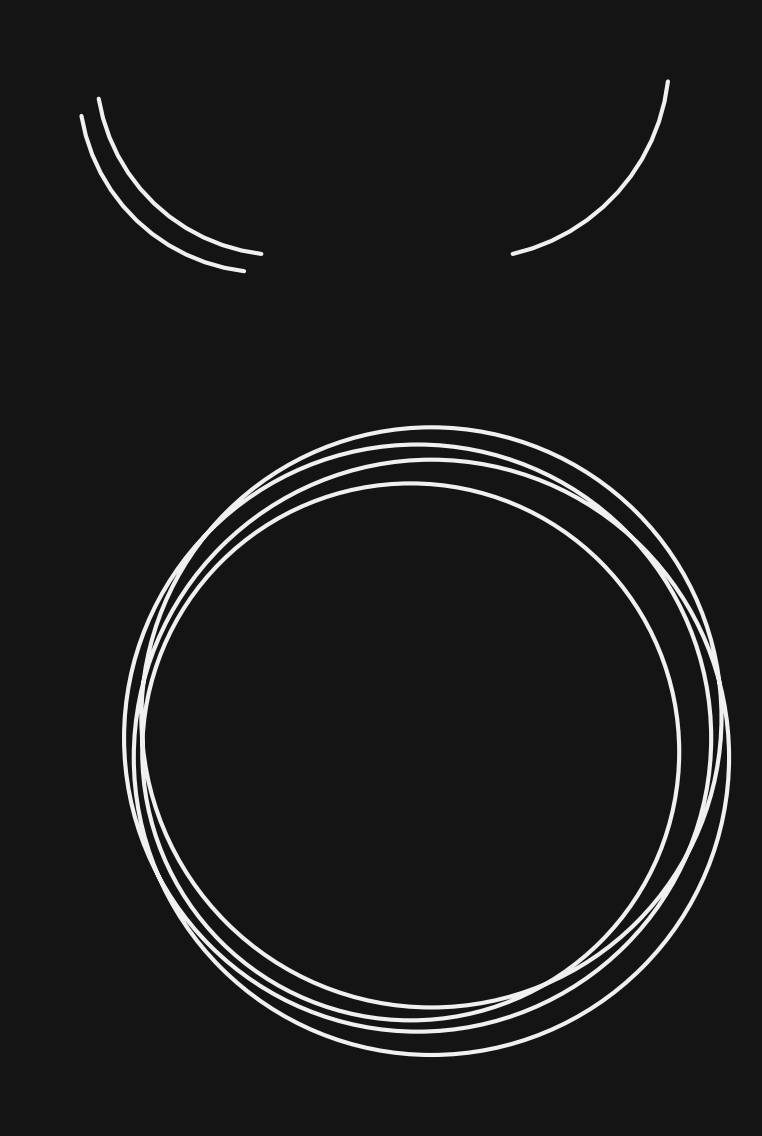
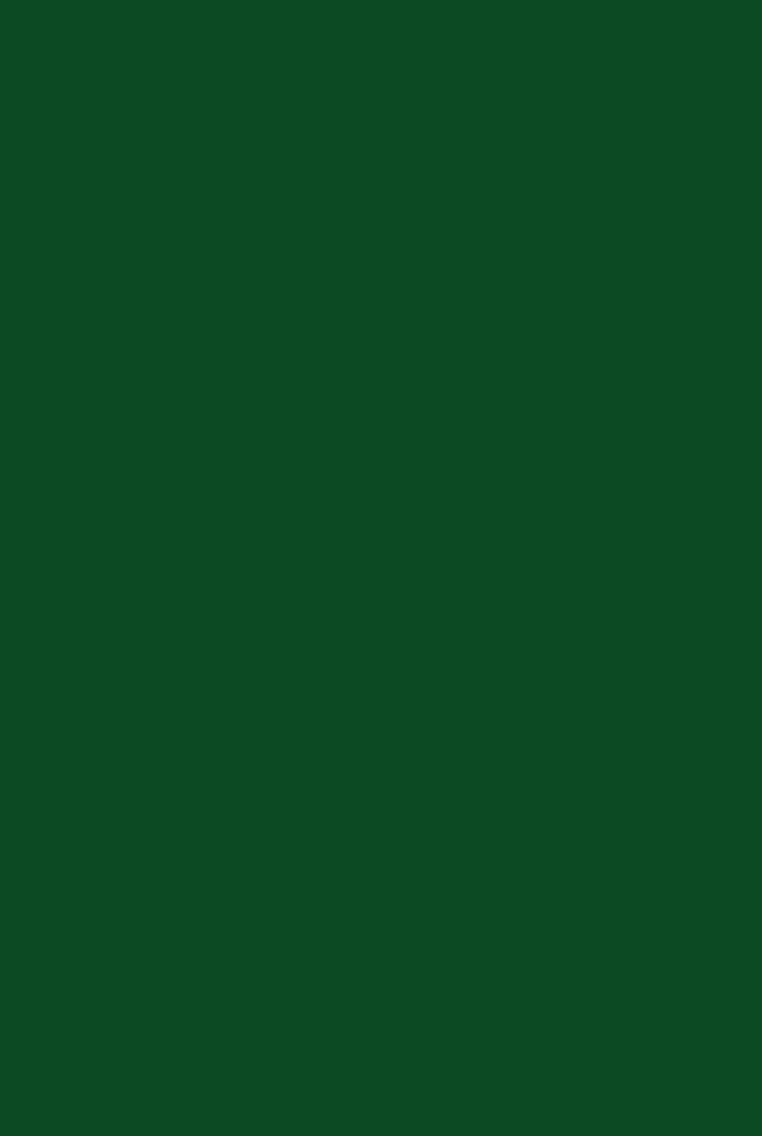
line: (667, 81) (664, 101) (651, 140) (630, 176) (617, 192) (587, 219) (569, 231) (532, 248) (512, 253) -> none
line: (98, 98) (103, 118) (117, 155) (128, 172) (154, 203) (169, 216) (203, 237) (241, 250) (261, 253) -> none
line: (81, 115) (85, 135) (100, 172) (110, 190) (136, 220) (152, 233) (186, 254) (224, 267) (244, 271) -> none
drawing: [122, 425, 732, 1058] -> none

